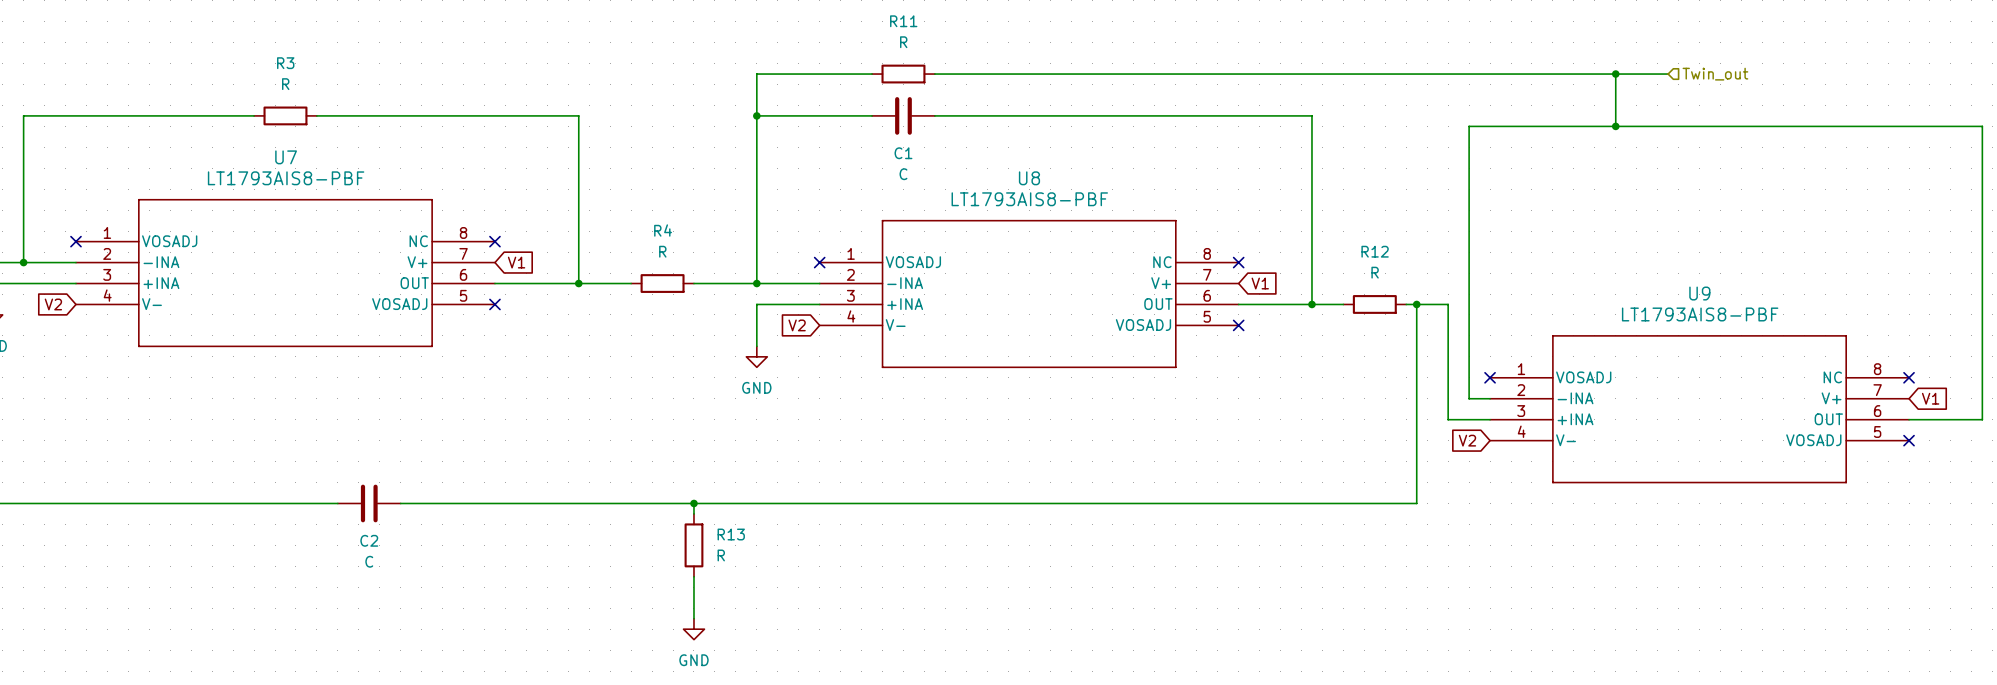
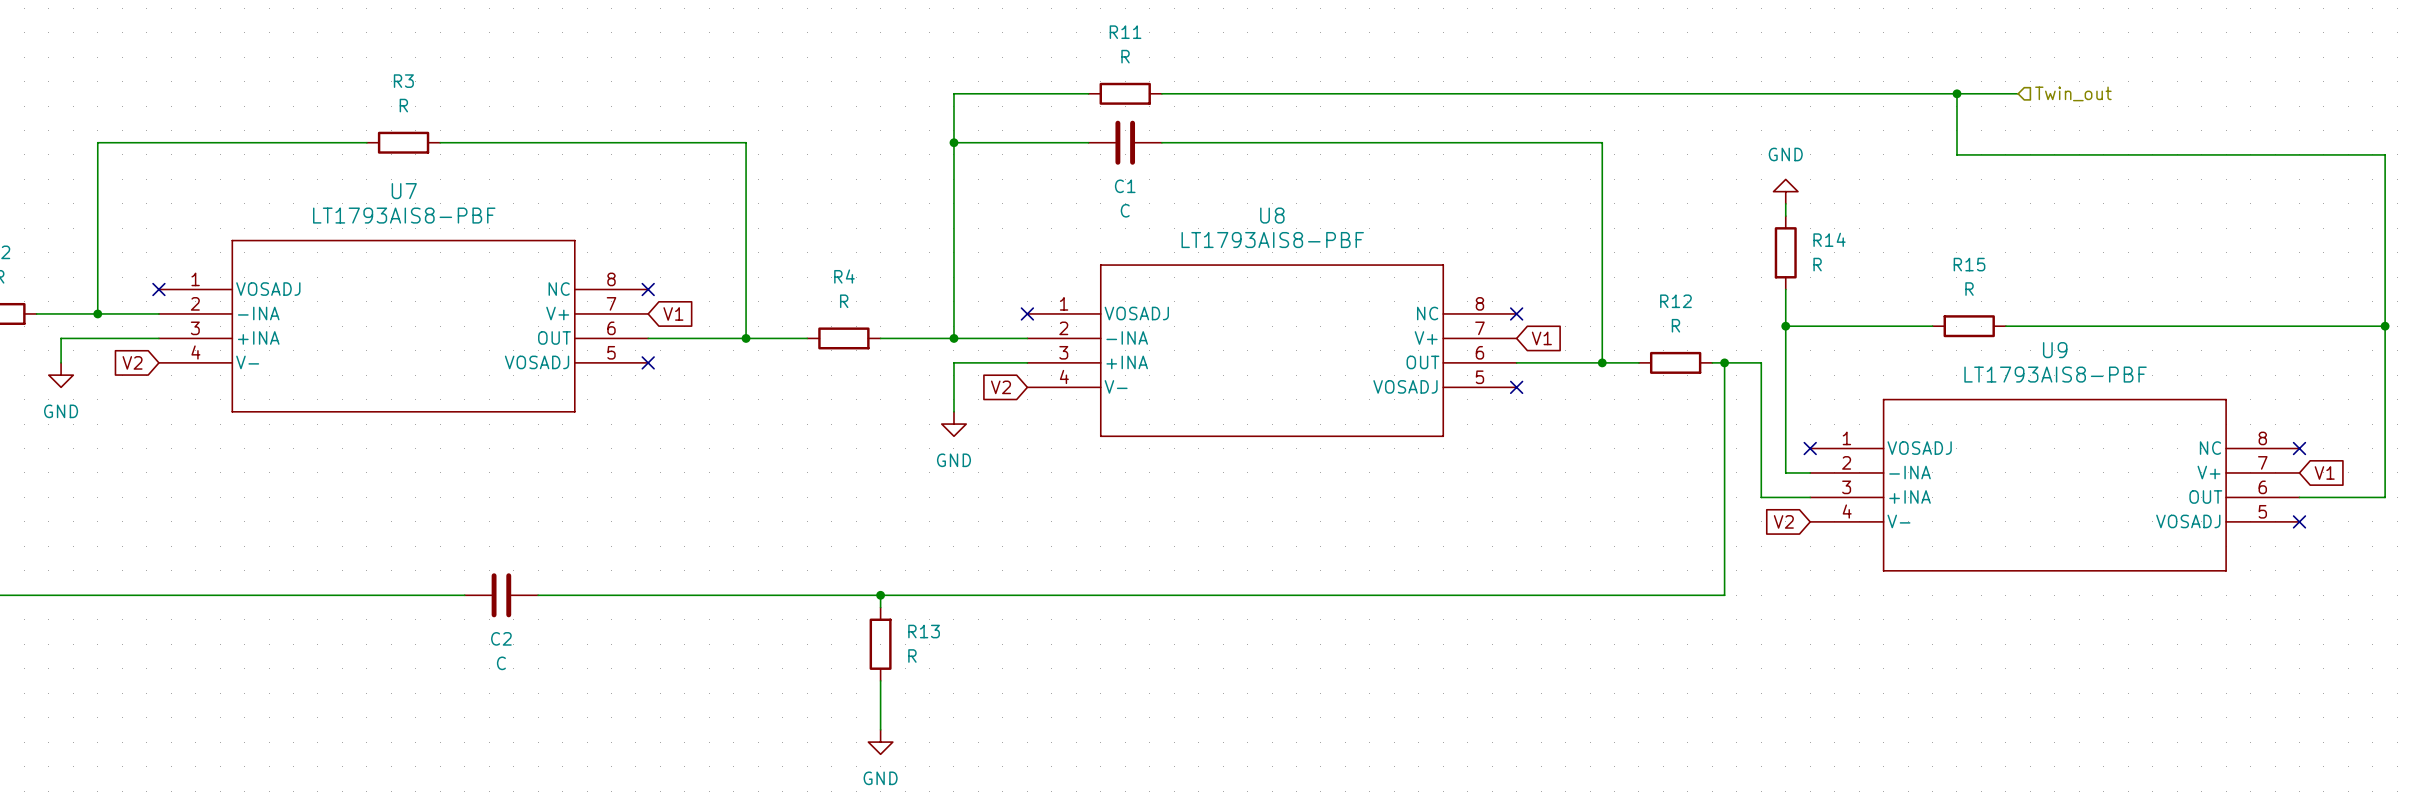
wire: (1615, 126) (1469, 126) (1469, 168) -> none
junction: (1615, 126) -> none
power symbol: none -> GND (1785, 191)
wire: (1469, 178) (1469, 241) -> none
R14: none -> R (1785, 252)
wire: none -> (1785, 326) (1932, 326)
junction: none -> (1785, 326)
R15: none -> R (1969, 326)
wire: none -> (2005, 326) (2385, 326)
junction: none -> (2385, 326)

